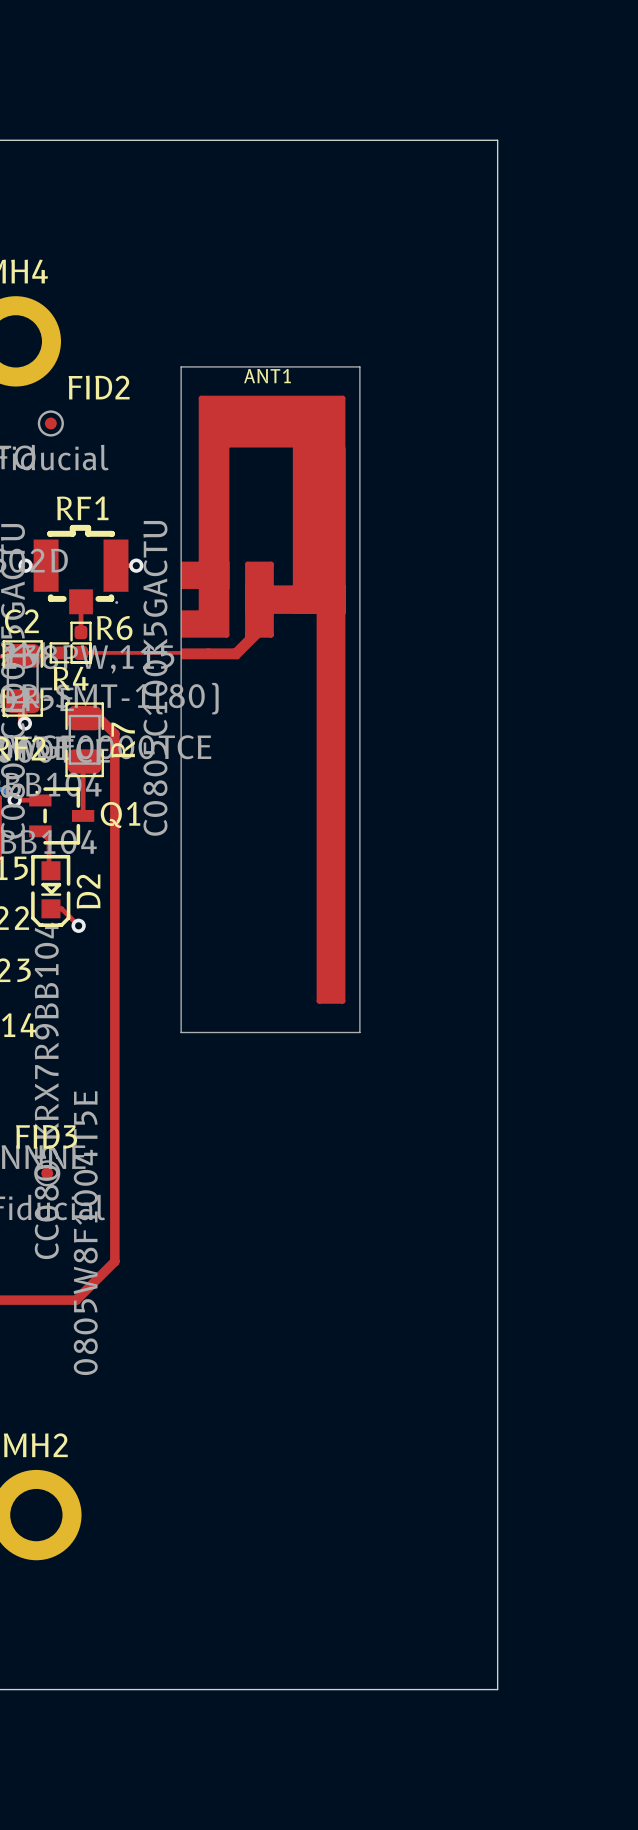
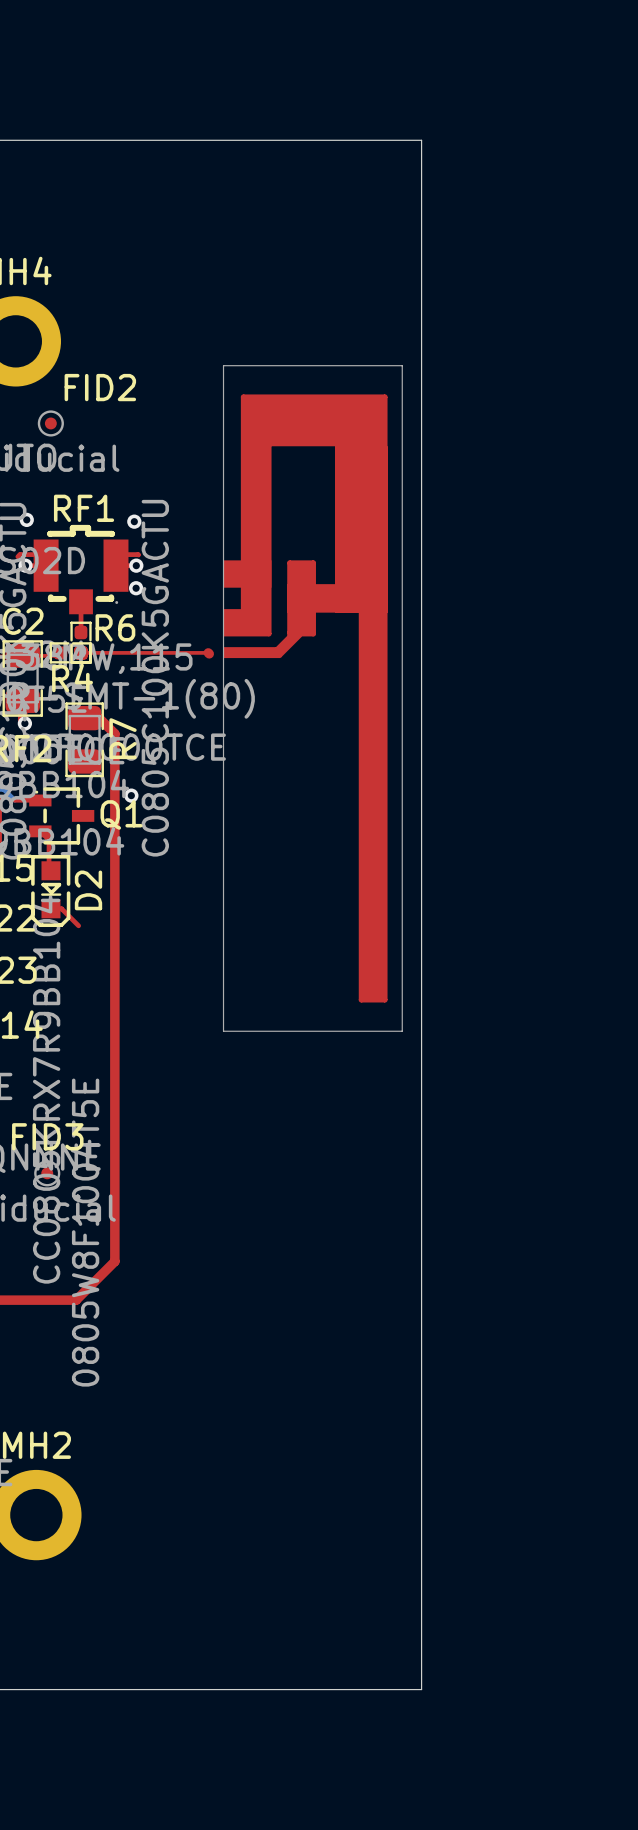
board edge: (421, 140) (497, 140) (497, 1689) (421, 1689) -> (421, 140) (421, 1689)
via: none -> (26, 519)
via: none -> (134, 521)
top track: none -> (45, 554) (19, 554) (17, 556)
top track: none -> (115, 554) (138, 554)
via: none -> (136, 588)
part: none -> (312, 698)
ANT1: (270, 699) -> none
top track: (84, 761) (83, 763) (83, 815) -> none
via: none -> (131, 795)
via: (14, 800) -> none
via: (78, 925) -> none

